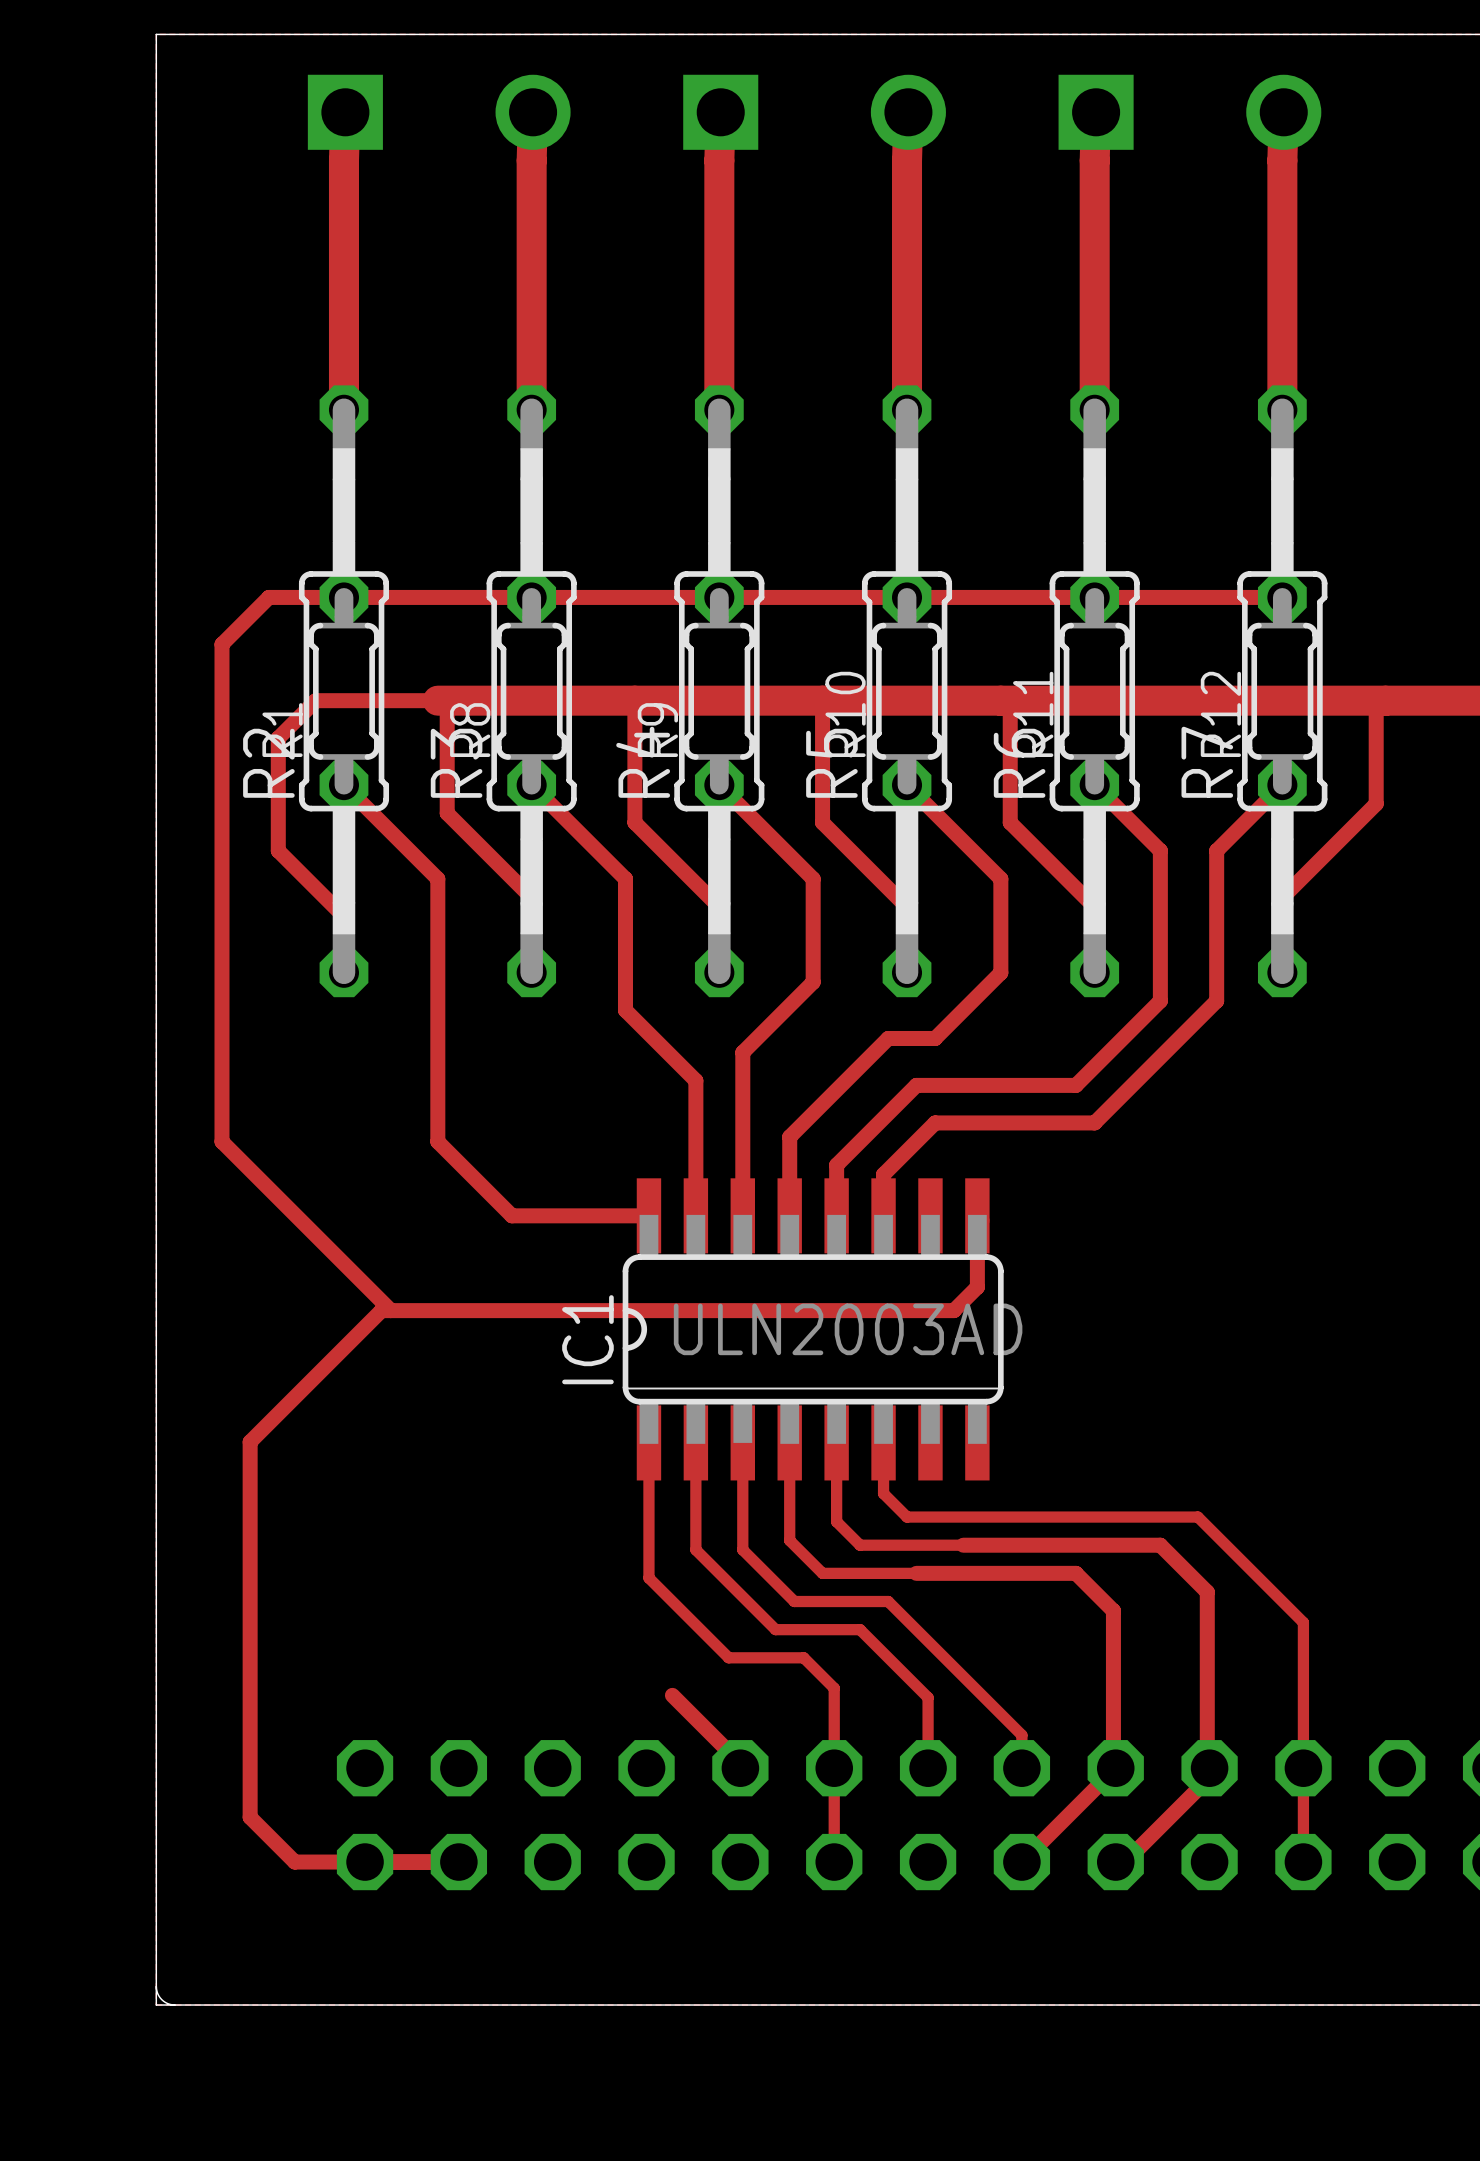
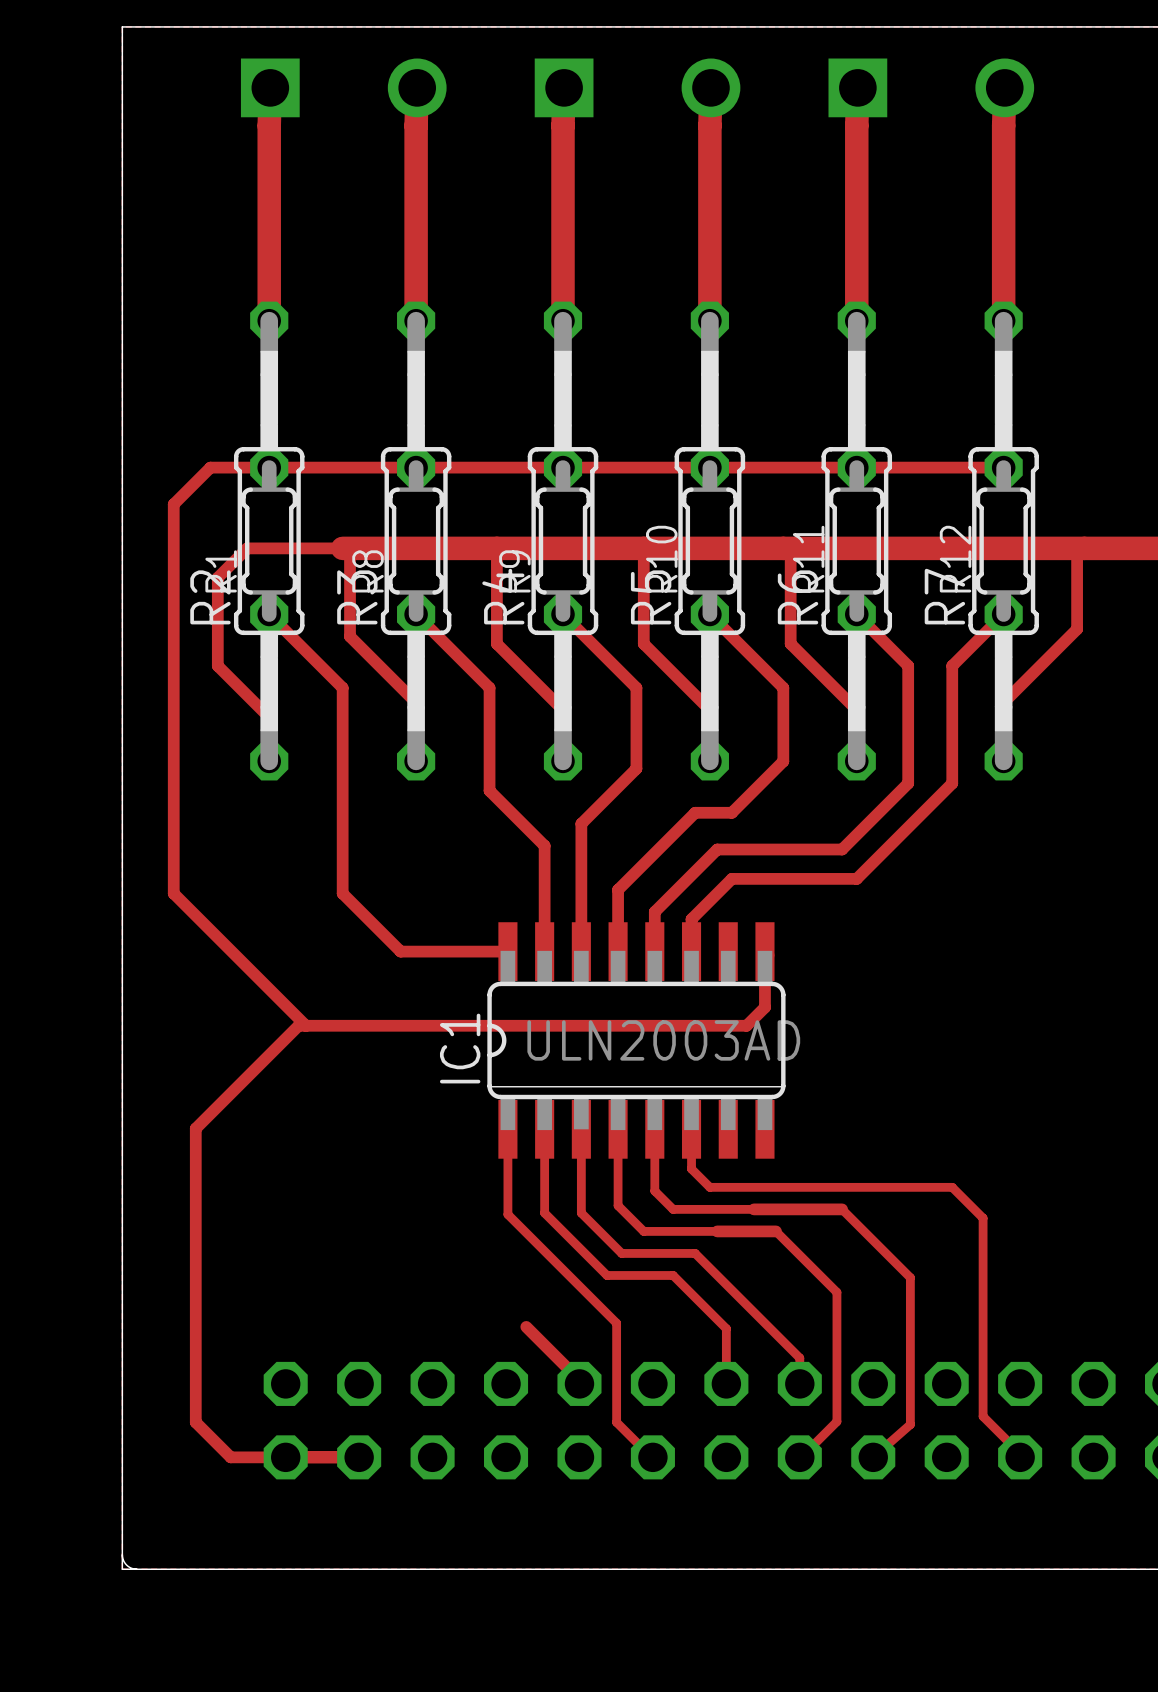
top track: (1197, 1517) (1303, 1622) (1303, 1857) -> (937, 1187) (952, 1187) (983, 1218) (983, 1416) (1020, 1453)
top track: (1075, 1545) (1160, 1545) (1207, 1592) (1207, 1779) (1125, 1862) (1115, 1862) -> (842, 1209) (910, 1277) (910, 1424) (873, 1457)
top track: (648, 1551) (648, 1578) (728, 1657) (803, 1657) (834, 1688) (834, 1862) -> (507, 1214) (616, 1323) (616, 1422) (652, 1457)
top track: (991, 1573) (1075, 1573) (1113, 1610) (1113, 1770) (1021, 1861) -> (775, 1231) (836, 1292) (836, 1421) (799, 1457)

